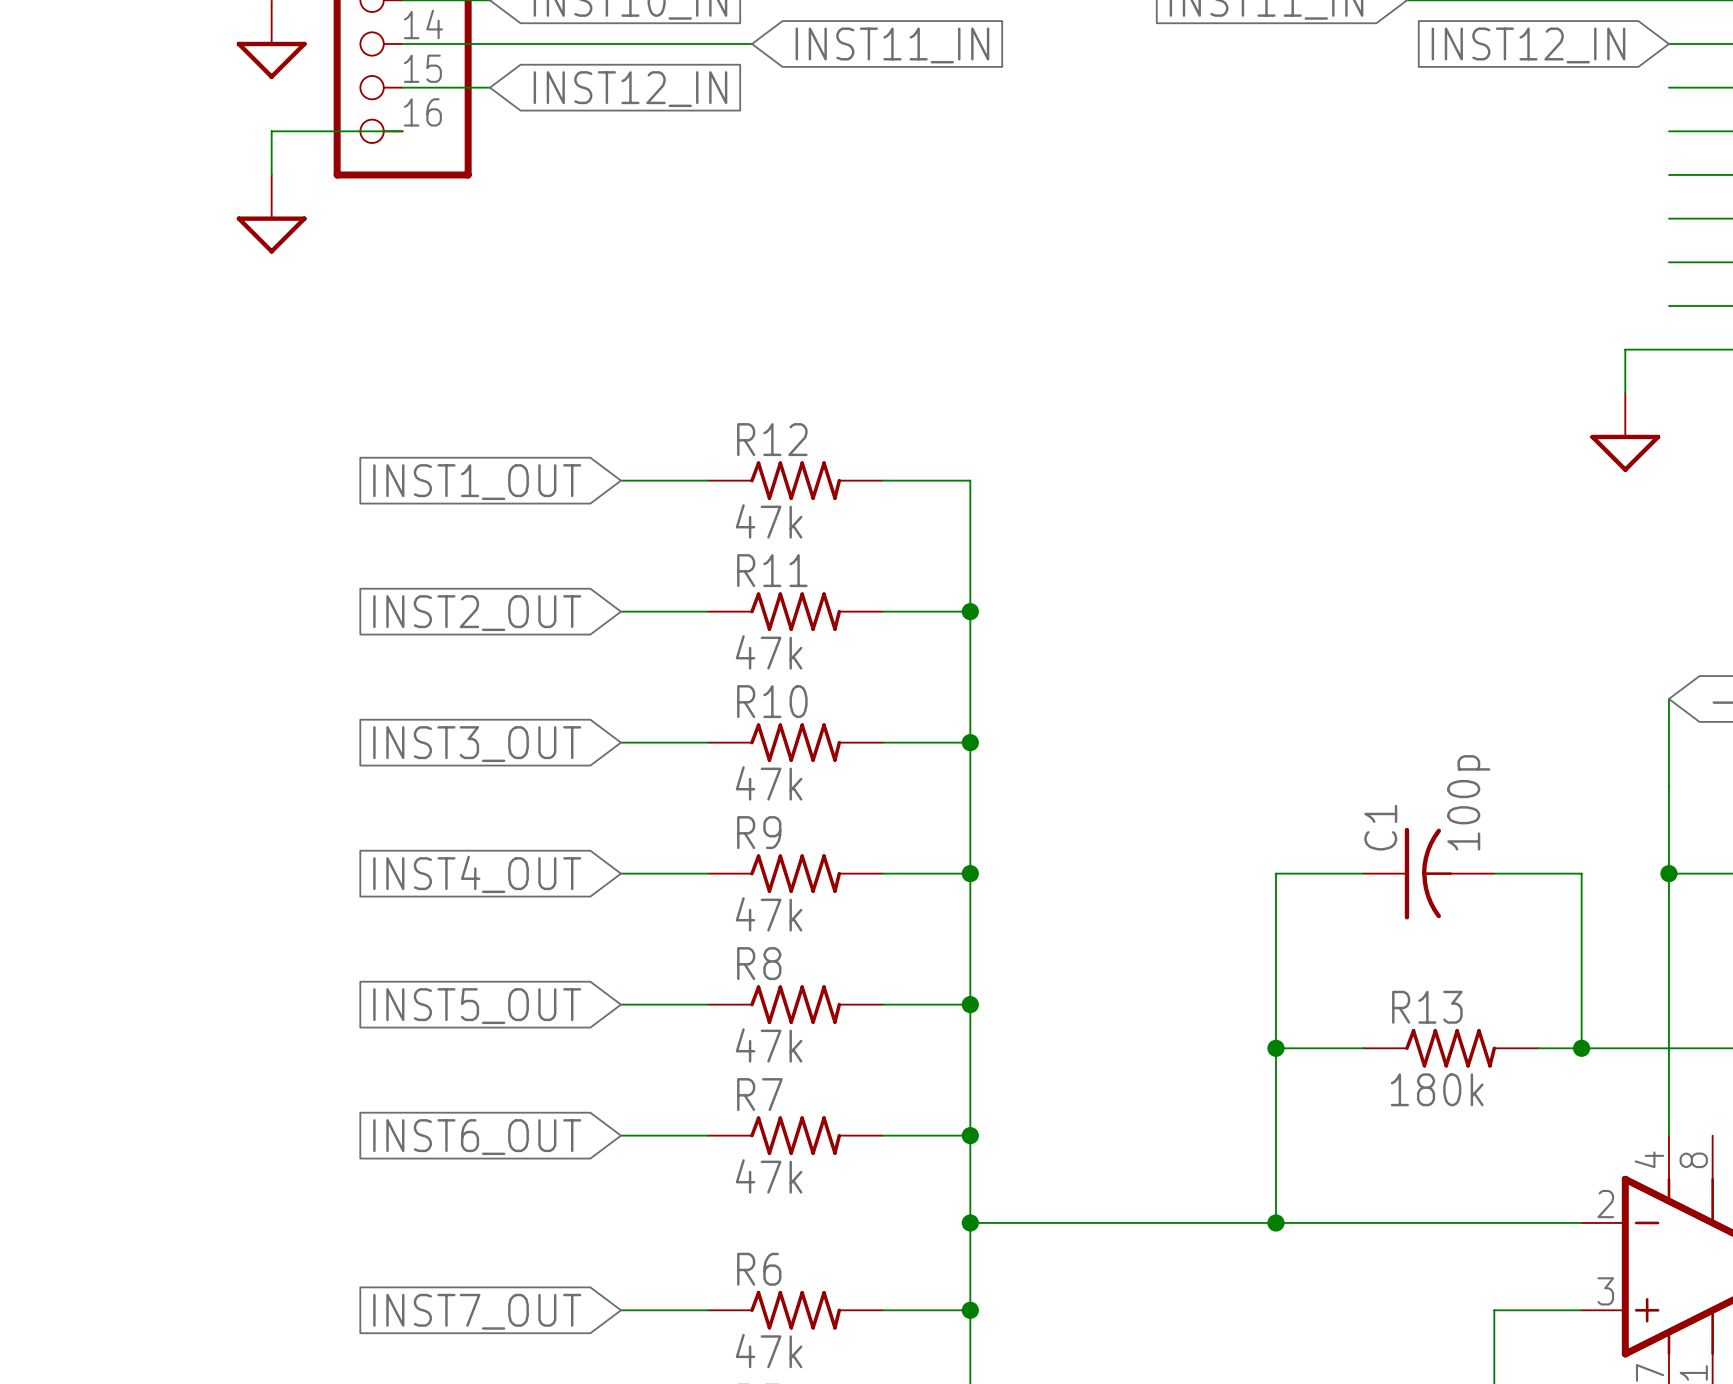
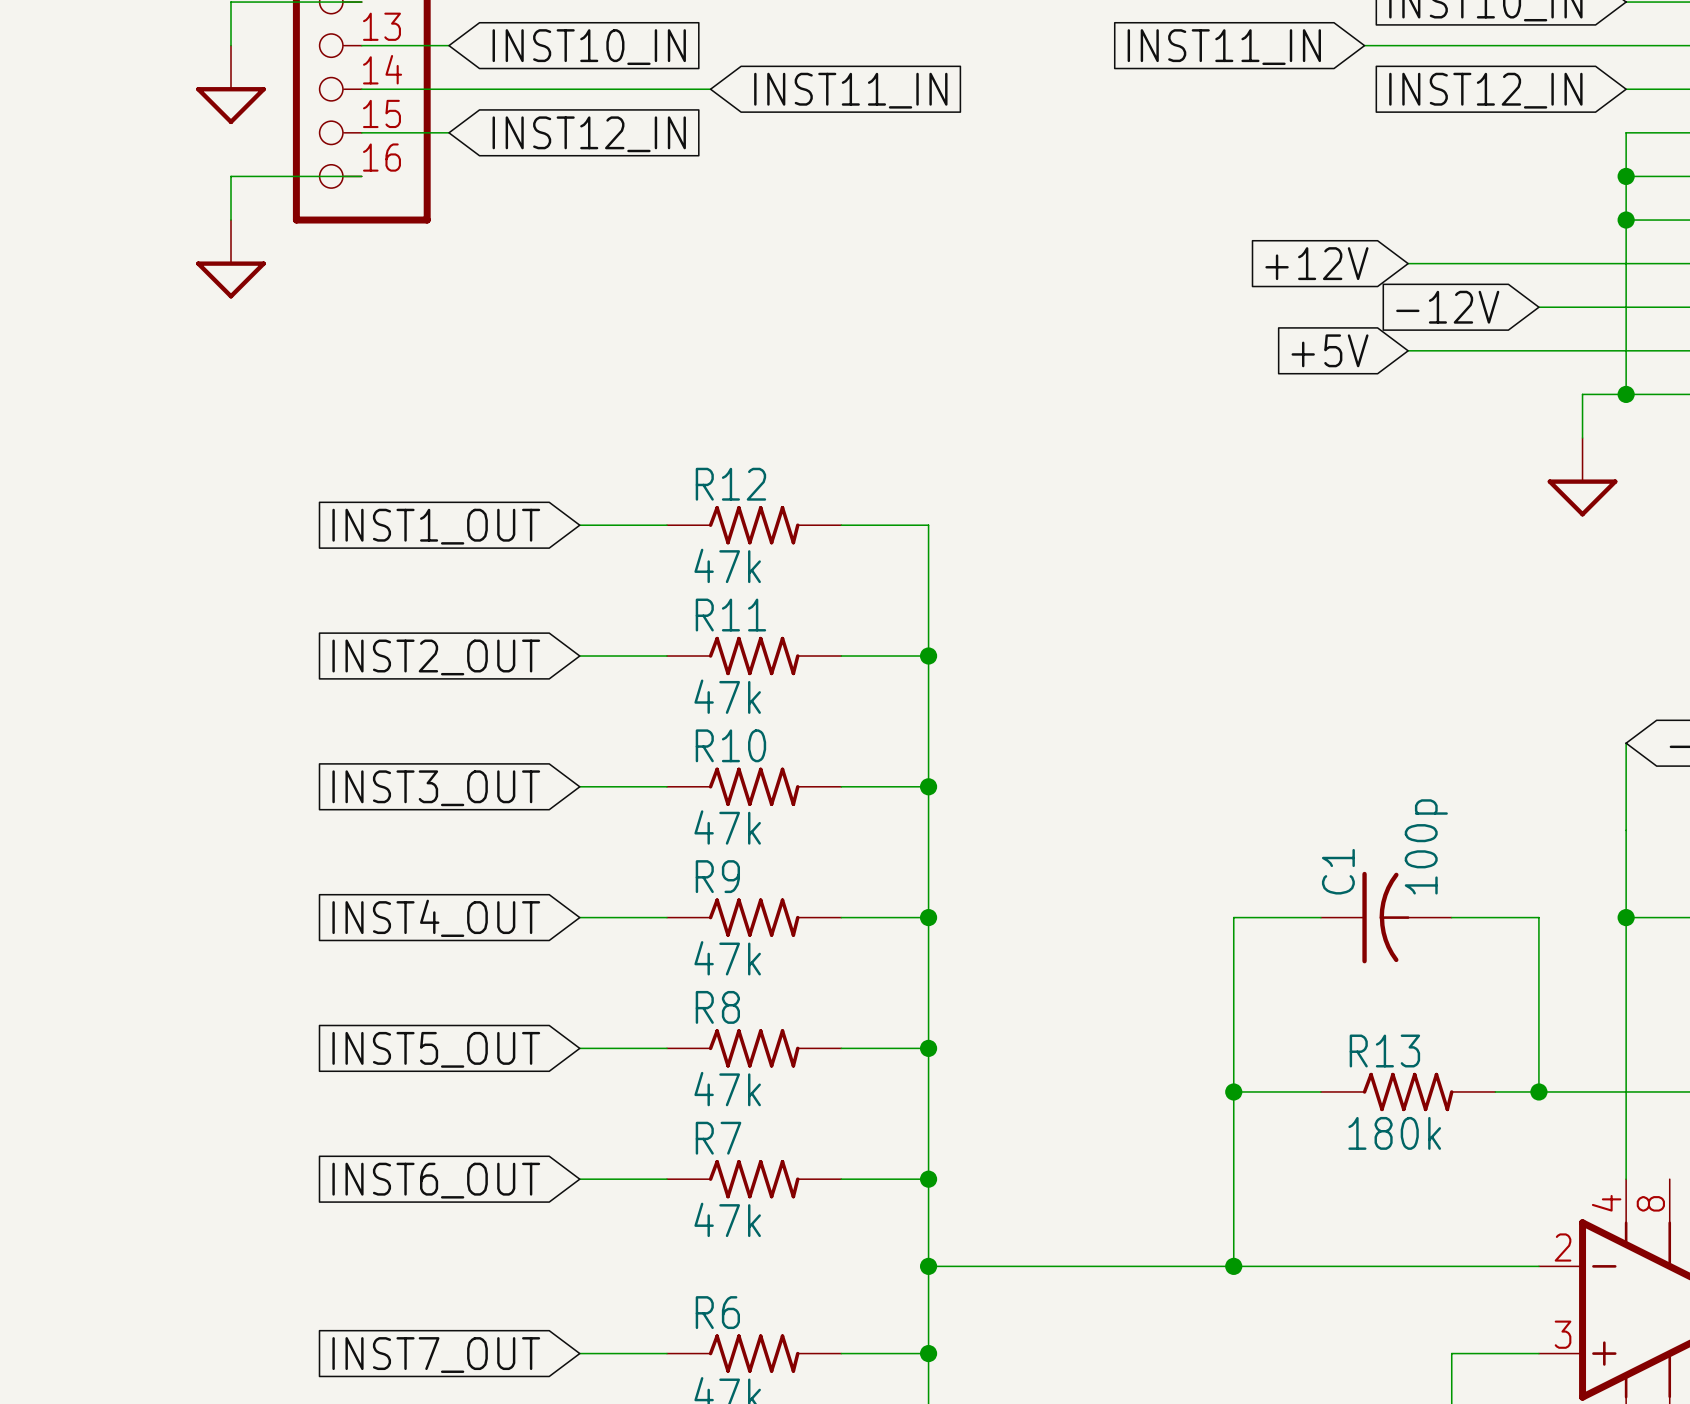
wire: none -> (1626, 132) (1626, 394)
junction: none -> (1626, 176)
junction: none -> (1626, 220)
global label: none -> +12V (1316, 263)
wire: none -> (1408, 263) (1626, 263)
global label: none -> -12V (1447, 307)
wire: none -> (1538, 307) (1626, 307)
global label: none -> +5V (1330, 350)
wire: none -> (1408, 350) (1626, 350)
junction: none -> (1626, 394)

